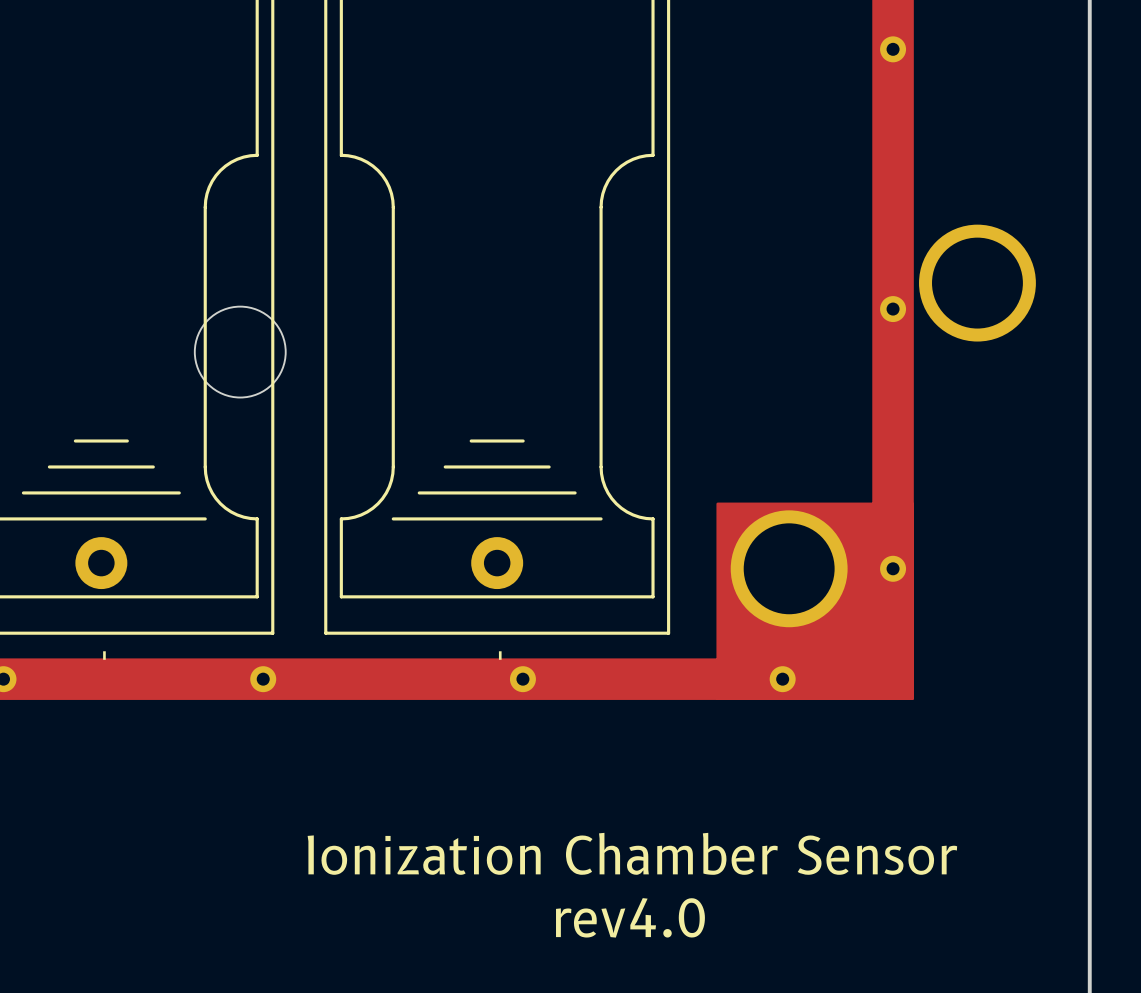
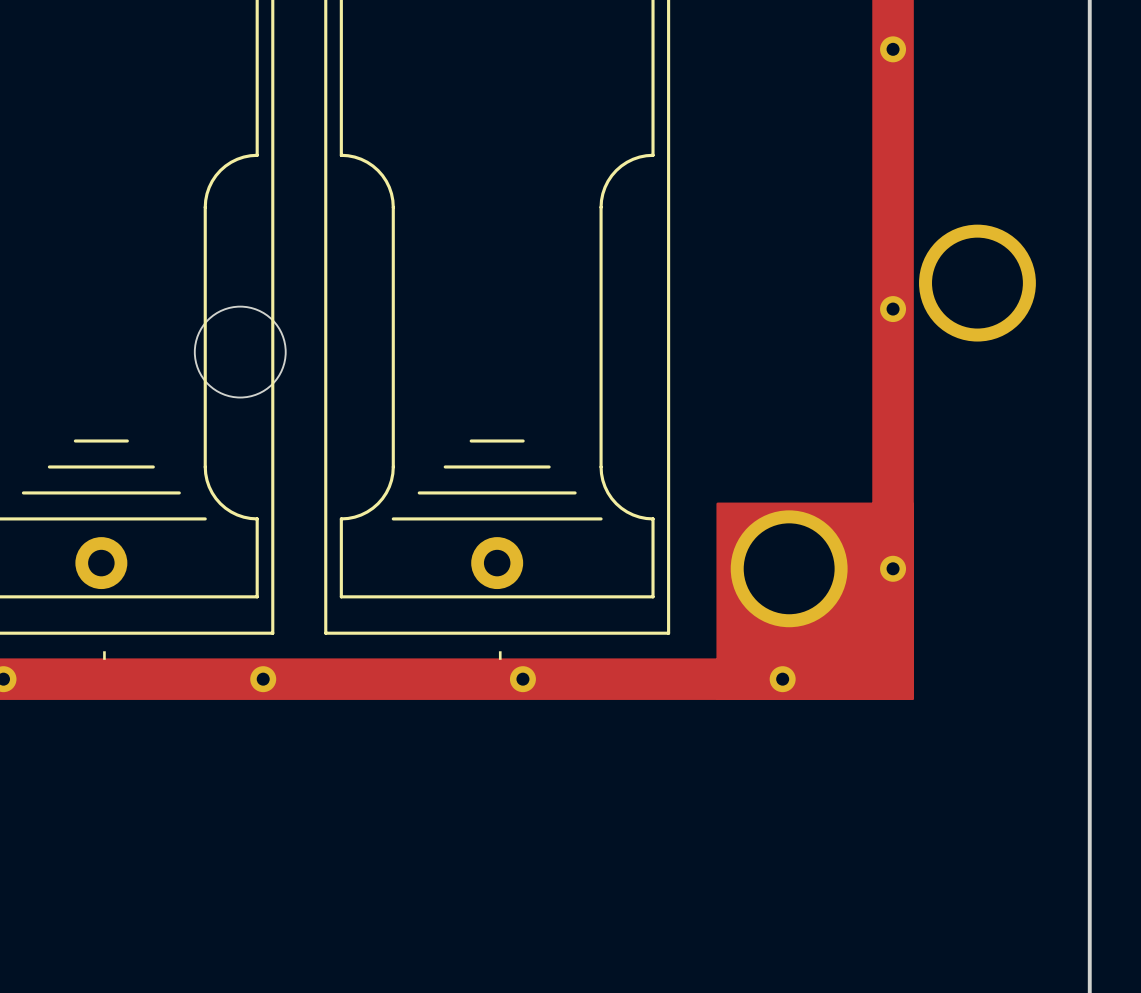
text: Ionization Chamber Sensor (632, 853) -> none
text: rev4.0 (630, 917) -> none

